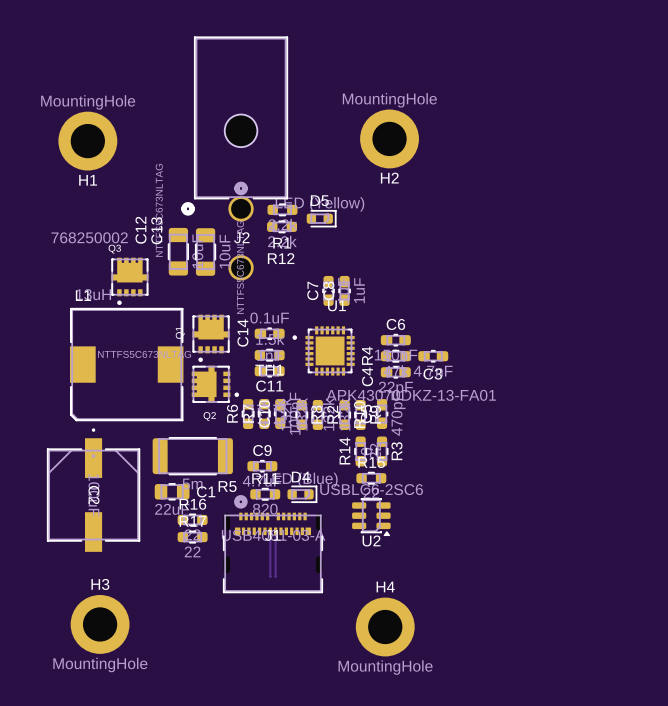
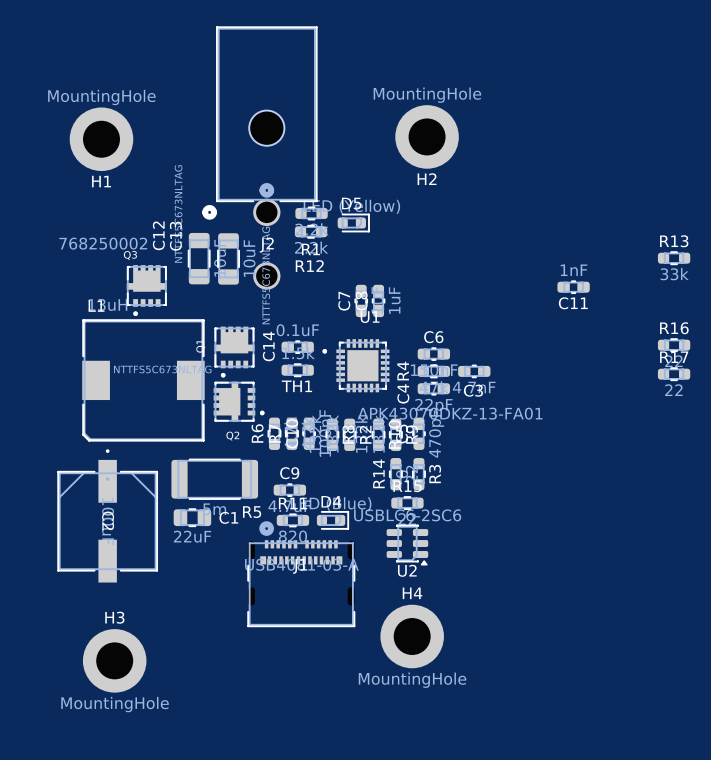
R13: none -> 33k (674, 258)
C11 position: (269, 371) -> (573, 287)
R16 position: (192, 519) -> (674, 345)
track: (270, 531) (270, 576) -> none
track: (275, 531) (275, 576) -> none
R17 position: (192, 537) -> (674, 374)
H4 position: (385, 627) -> (412, 636)

